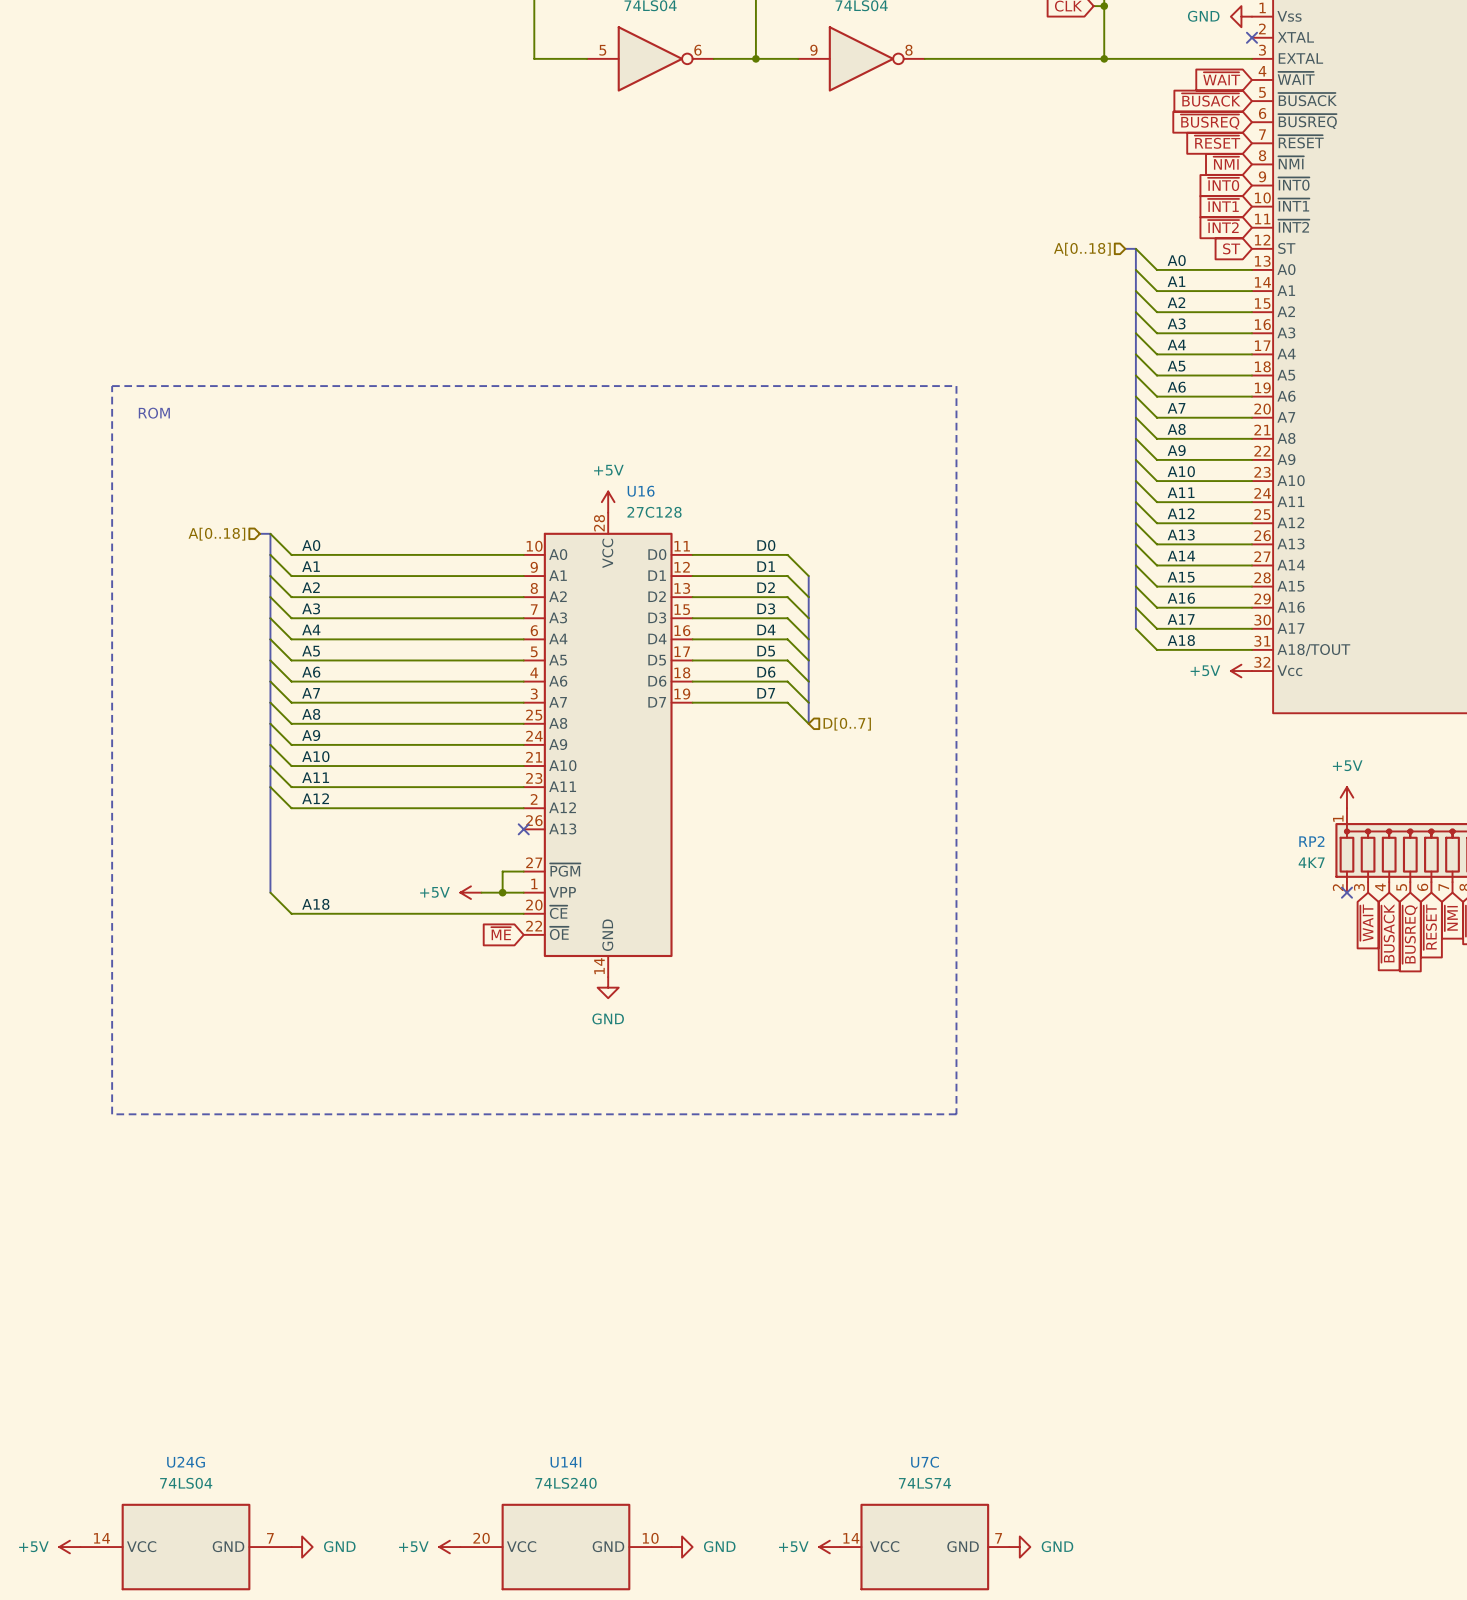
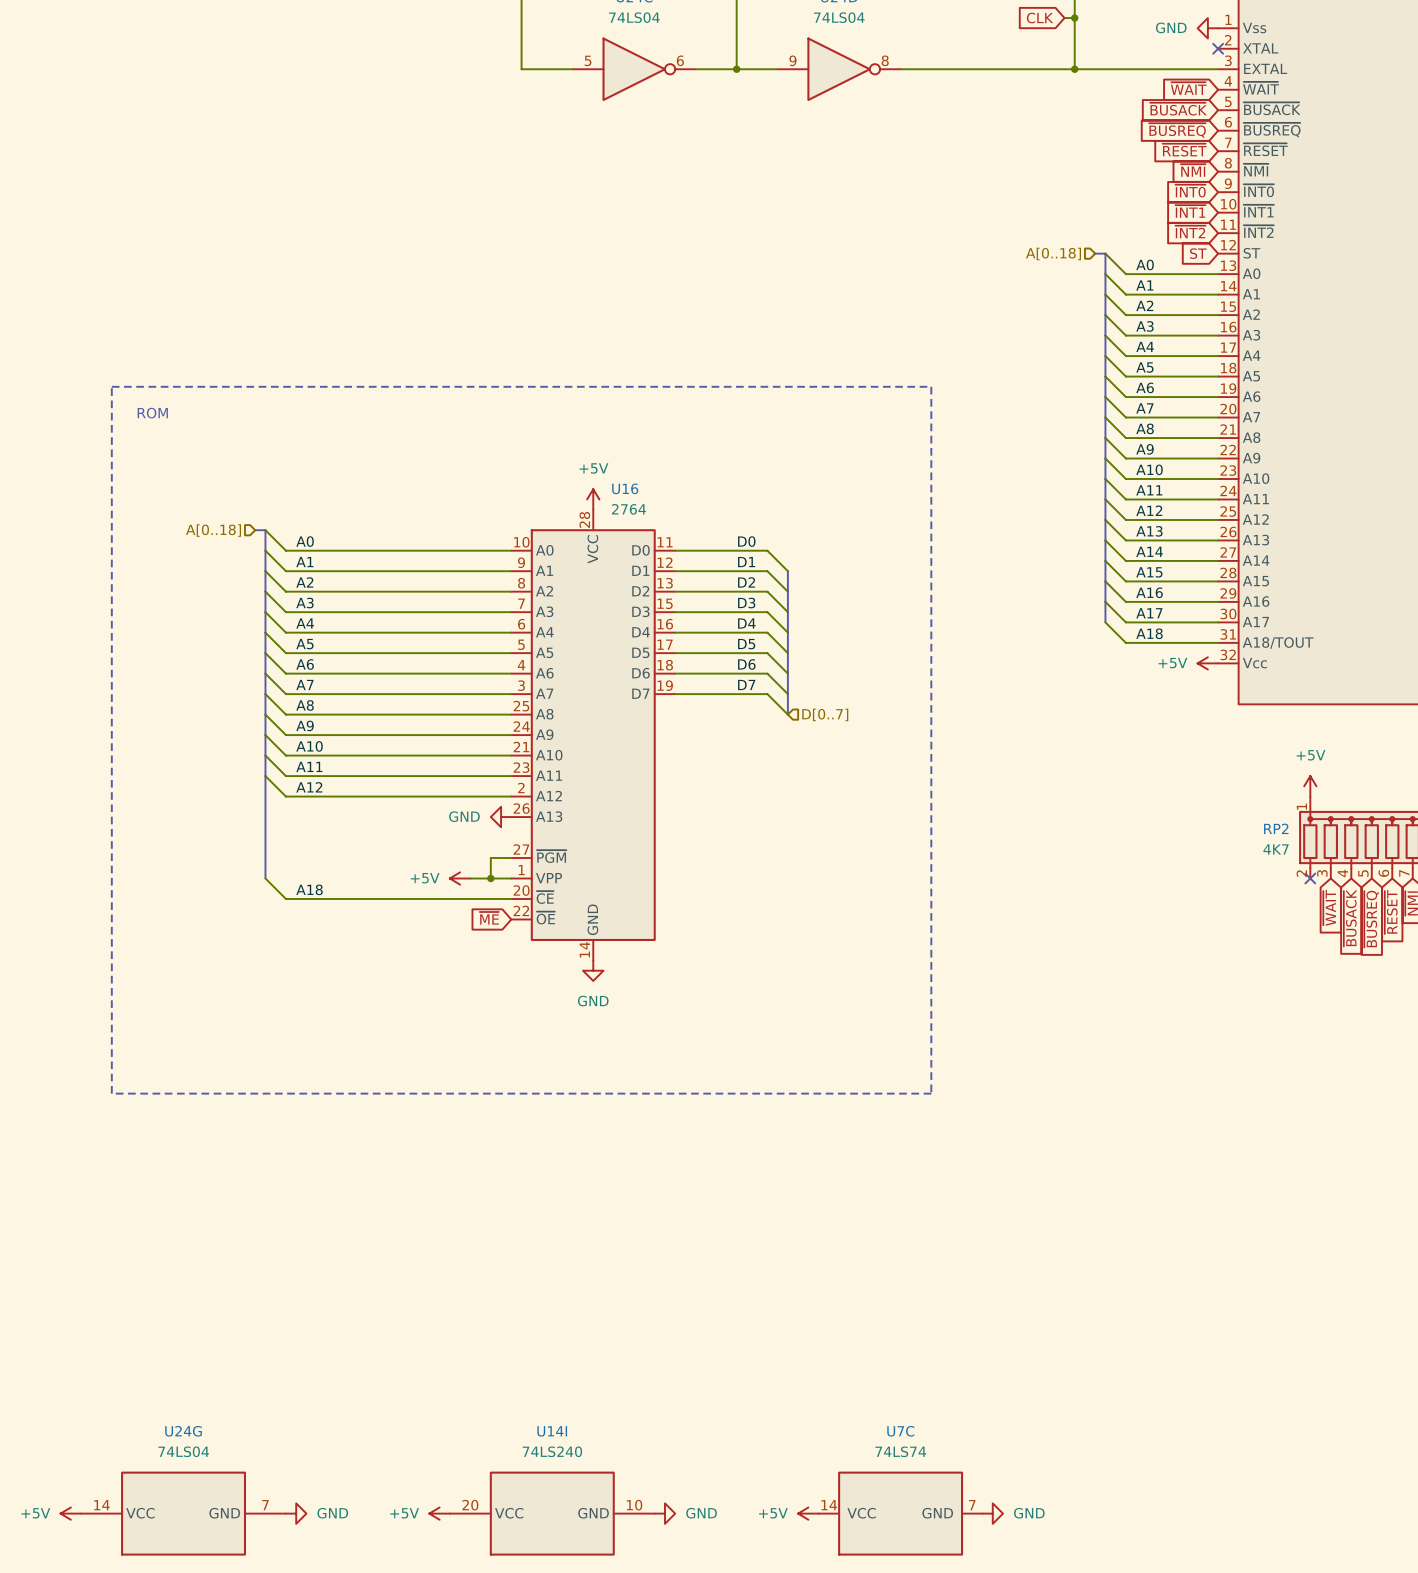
U16 value: 27C128 (654, 512) -> 2764 (628, 509)
power symbol: none -> GND (501, 817)
no-connect mark: (523, 829) -> none

